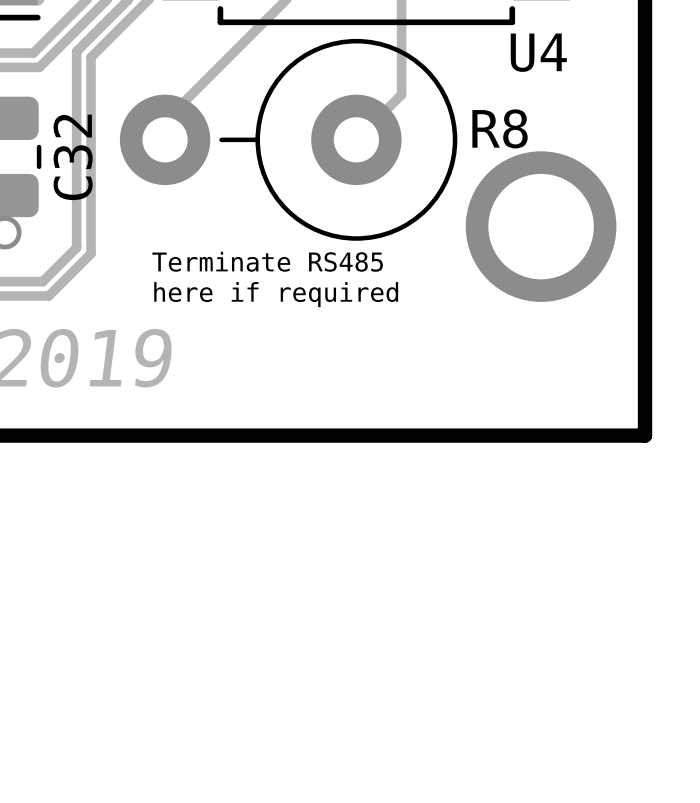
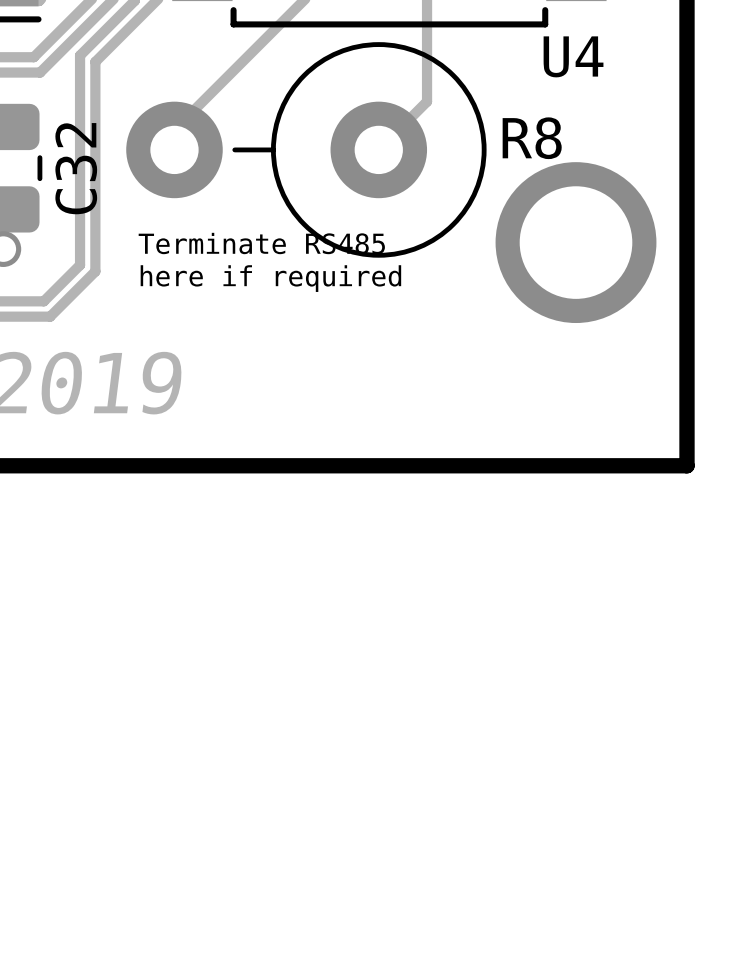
text position: Terminate RS485 (267, 261) -> Terminate RS485 (261, 243)
text position: here if required (276, 294) -> here if required (270, 278)

